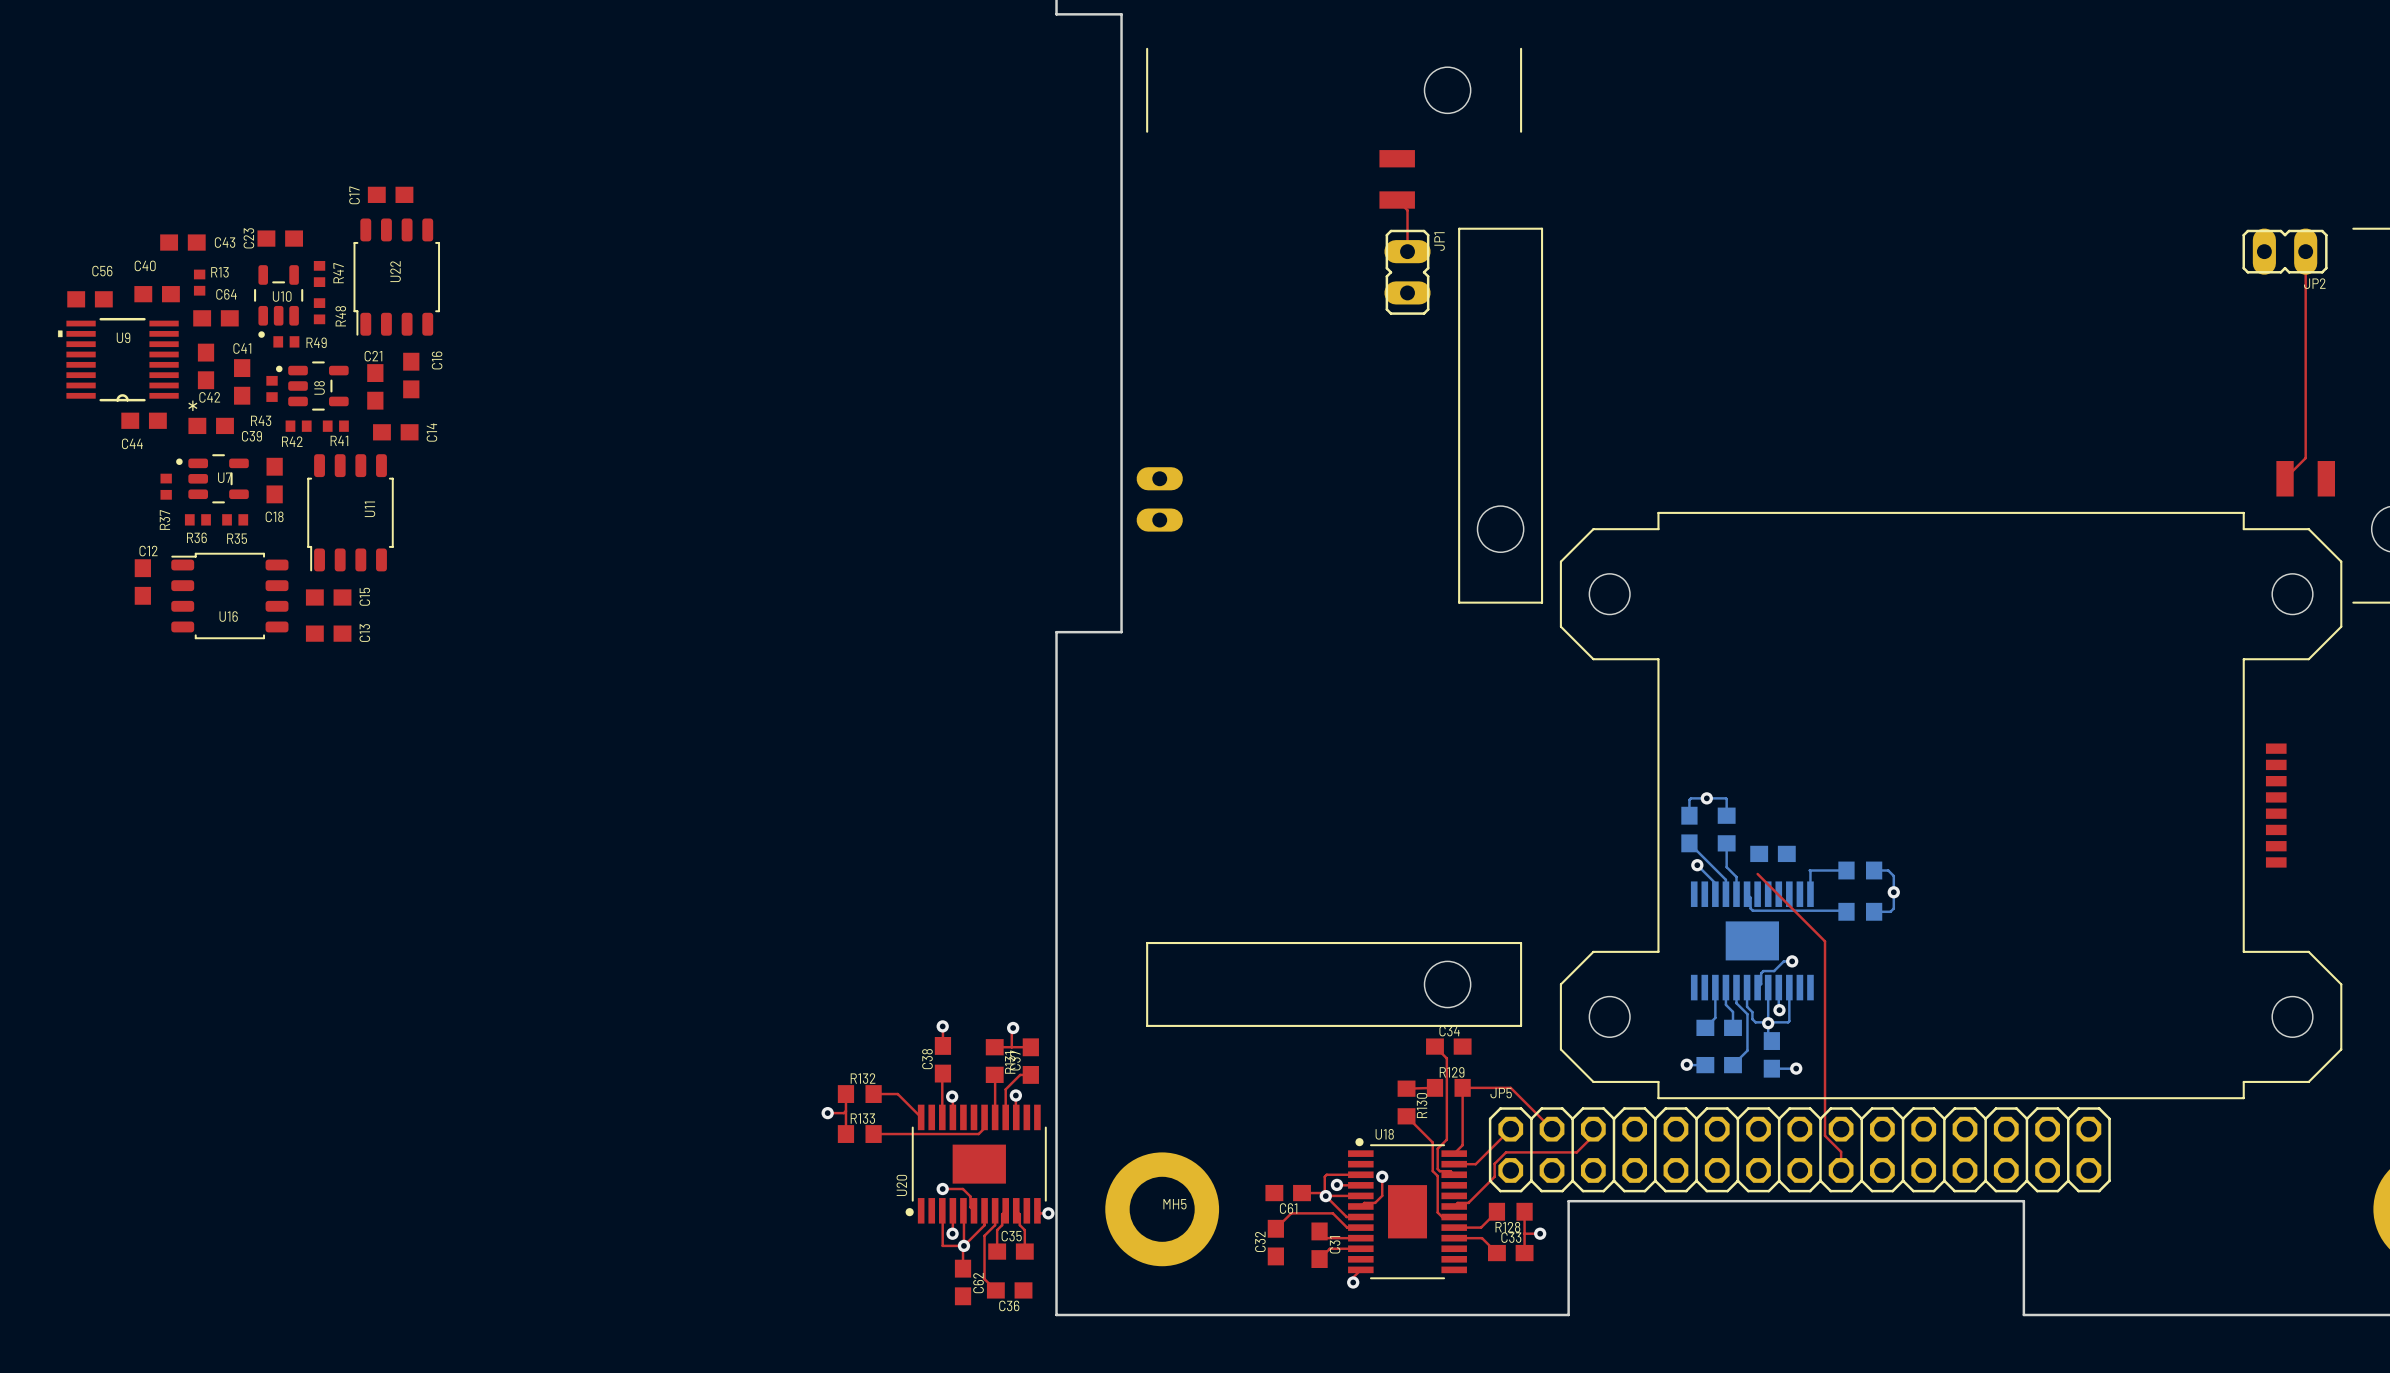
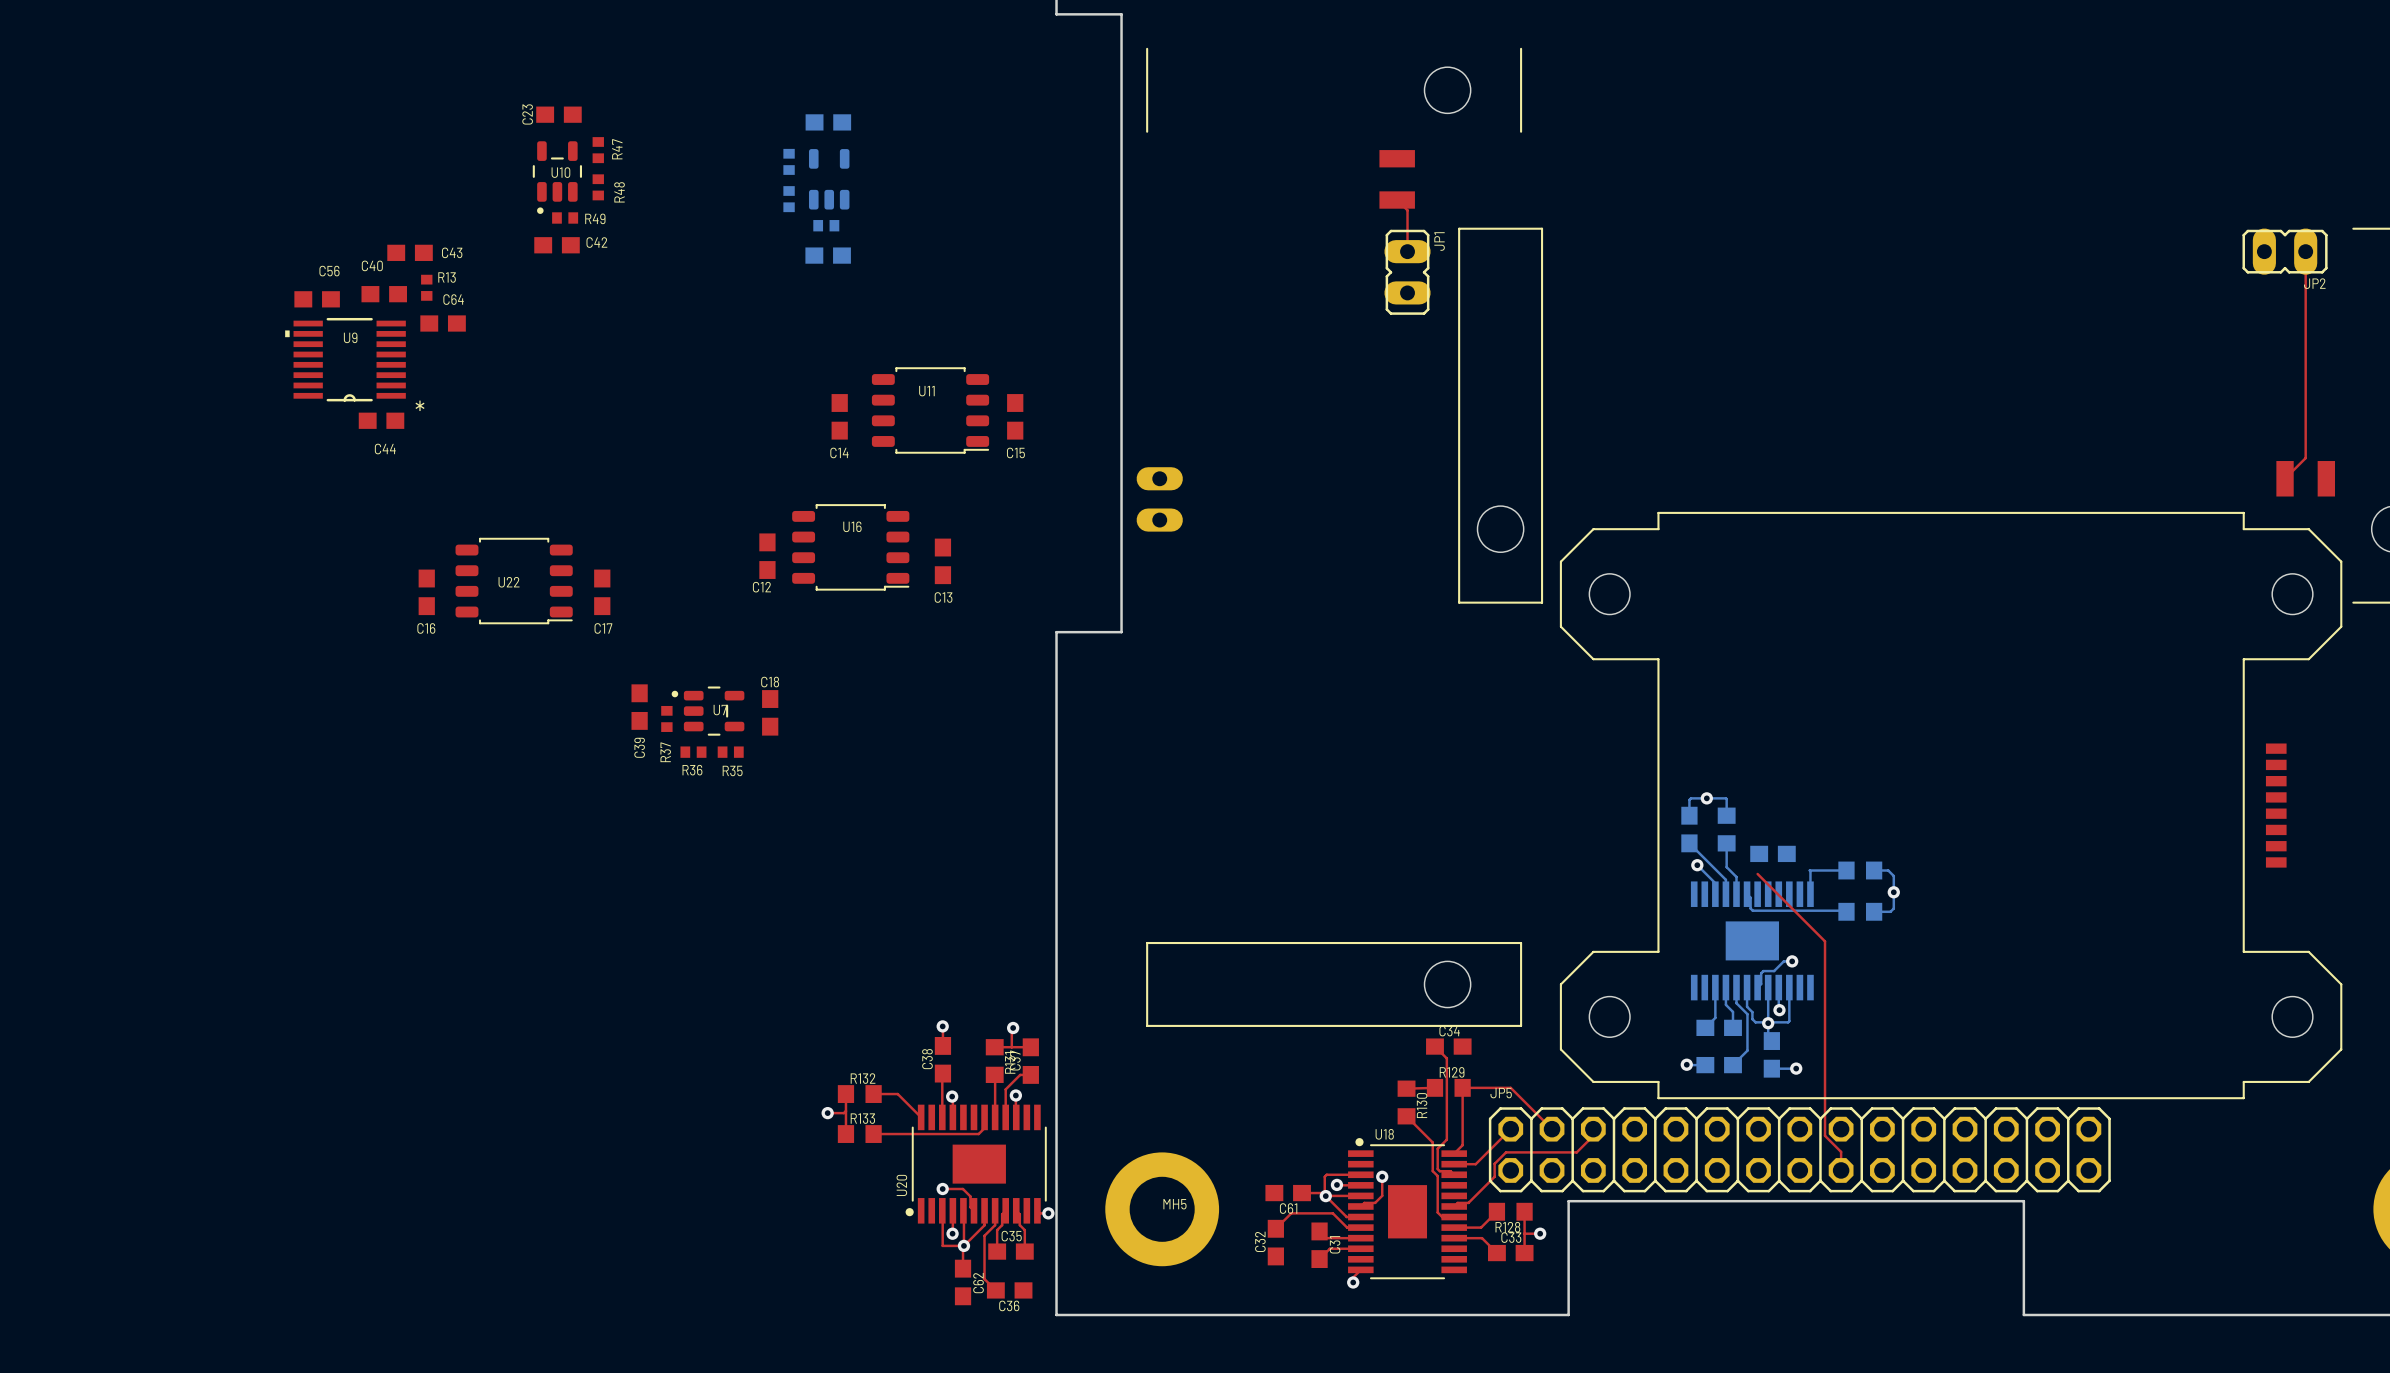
part: none -> (828, 122)
part: none -> (789, 161)
part: none -> (829, 179)
C17 rotation: 0° (390, 194) -> 90° clockwise (602, 592)
C17 position: (390, 194) -> (602, 592)
C17 name position: C17 (354, 195) -> C17 (603, 628)
part: none -> (789, 199)
part: none -> (826, 225)
C23 position: (280, 238) -> (558, 114)
C43 position: (182, 242) -> (410, 252)
part: none -> (828, 255)
R47 position: (319, 273) -> (598, 150)
U22 rotation: 0° (396, 277) -> 90° counterclockwise (514, 581)
U22 position: (396, 277) -> (514, 581)
R13 position: (199, 282) -> (426, 287)
C40 position: (157, 294) -> (384, 294)
C56 position: (90, 299) -> (317, 299)
U10 position: (278, 301) -> (557, 177)
R48 position: (319, 311) -> (598, 187)
C64 position: (215, 318) -> (443, 323)
R49 position: (286, 341) -> (565, 217)
U9 position: (118, 359) -> (345, 359)
C16 name rotation: 0° (437, 360) -> 90° clockwise (426, 628)
C16 name position: C16 (437, 360) -> C16 (426, 628)
C42 rotation: 0° (206, 366) -> 90° clockwise (557, 245)
C42 position: (206, 366) -> (557, 245)
C16 position: (411, 375) -> (426, 592)
C41: (242, 381) -> none
U8: (312, 386) -> none
C21: (375, 386) -> none
R43: (272, 388) -> none
C42 name position: C42 (209, 397) -> C42 (596, 242)
C44 position: (144, 420) -> (381, 420)
C39 rotation: 0° (211, 425) -> 90° clockwise (639, 707)
C39 position: (211, 425) -> (639, 707)
R42: (298, 426) -> none
R41: (335, 426) -> none
C14 rotation: 0° (395, 432) -> 90° clockwise (839, 416)
C14 position: (395, 432) -> (839, 416)
C44 name position: C44 (132, 443) -> C44 (385, 449)
U7 position: (212, 478) -> (708, 711)
C18 position: (274, 480) -> (770, 712)
R37 position: (166, 486) -> (666, 718)
U11 rotation: 0° (350, 512) -> 90° counterclockwise (930, 410)
U11 position: (350, 512) -> (930, 410)
C18 name position: C18 (274, 516) -> C18 (770, 682)
R36 position: (197, 519) -> (693, 752)
R35 position: (235, 519) -> (730, 752)
C12 name position: C12 (148, 551) -> C12 (761, 587)
C12 position: (142, 582) -> (767, 556)
U16 rotation: 0° (229, 595) -> 180° (850, 547)
U16 position: (229, 595) -> (850, 547)
C15 rotation: 0° (328, 597) -> 90° clockwise (1015, 416)
C15 position: (328, 597) -> (1015, 416)
C13 rotation: 0° (328, 633) -> 90° clockwise (942, 561)
C13 position: (328, 633) -> (942, 561)

